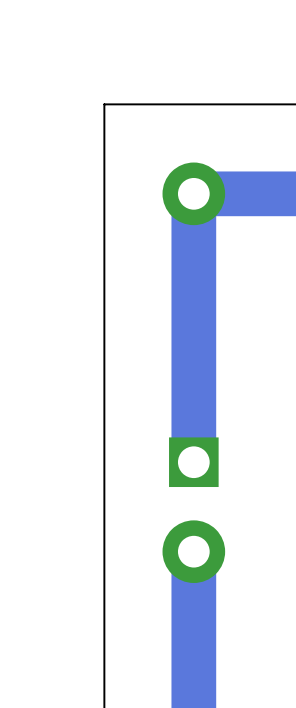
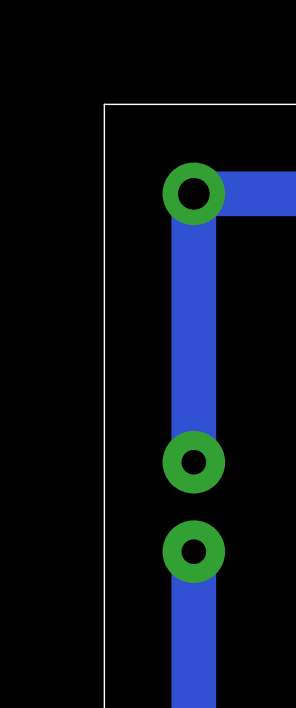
part footprint: [162, 437, 226, 583] -> [162, 430, 226, 583]

